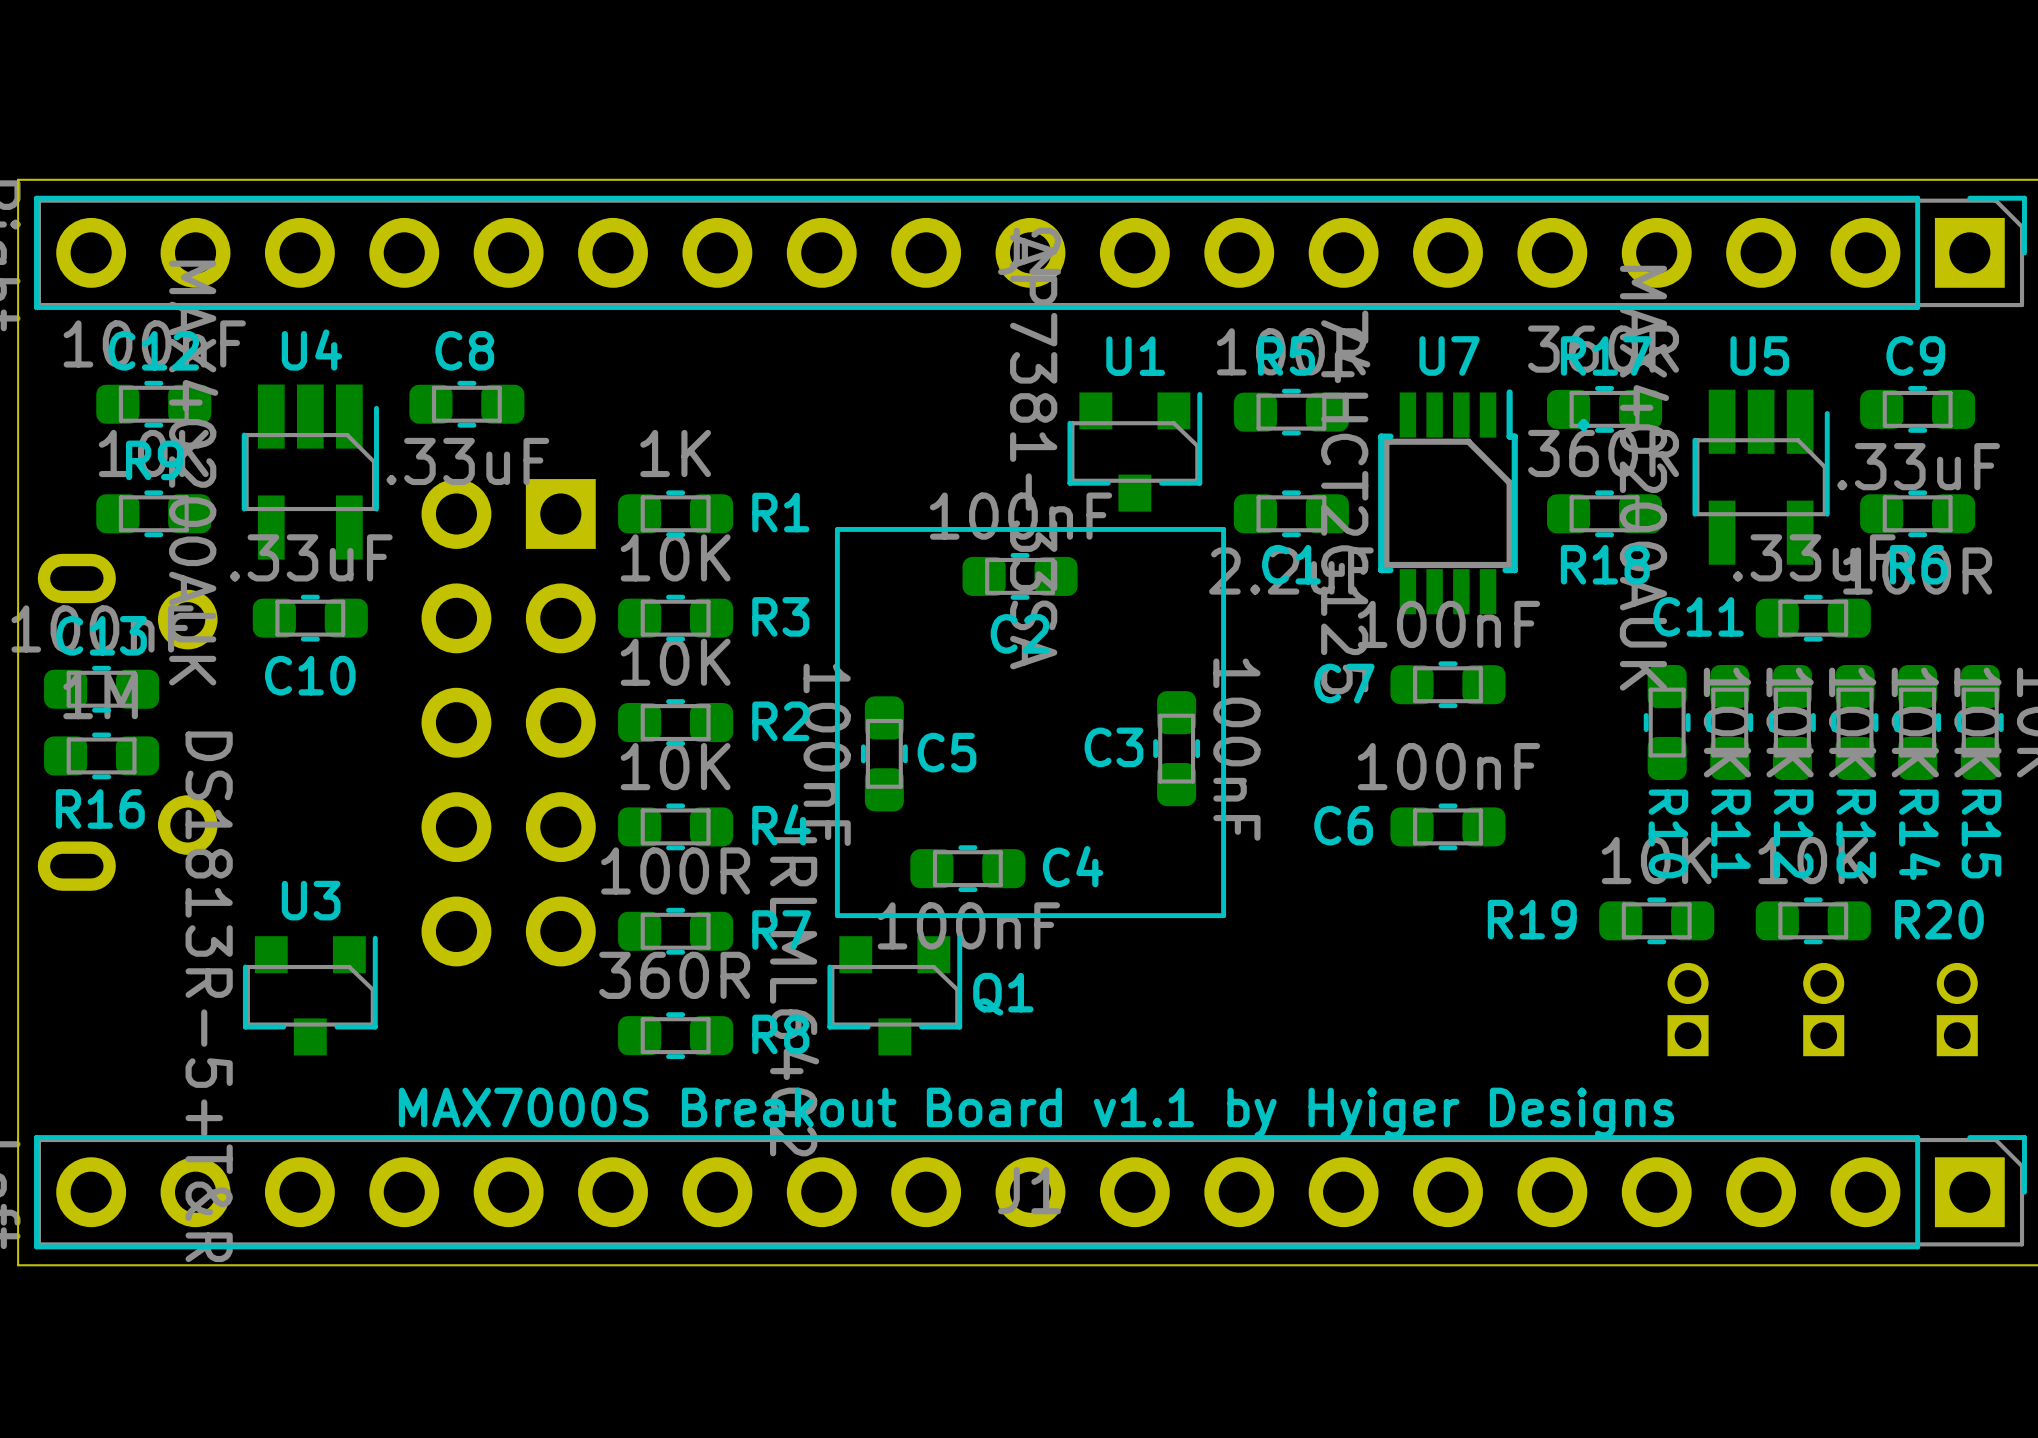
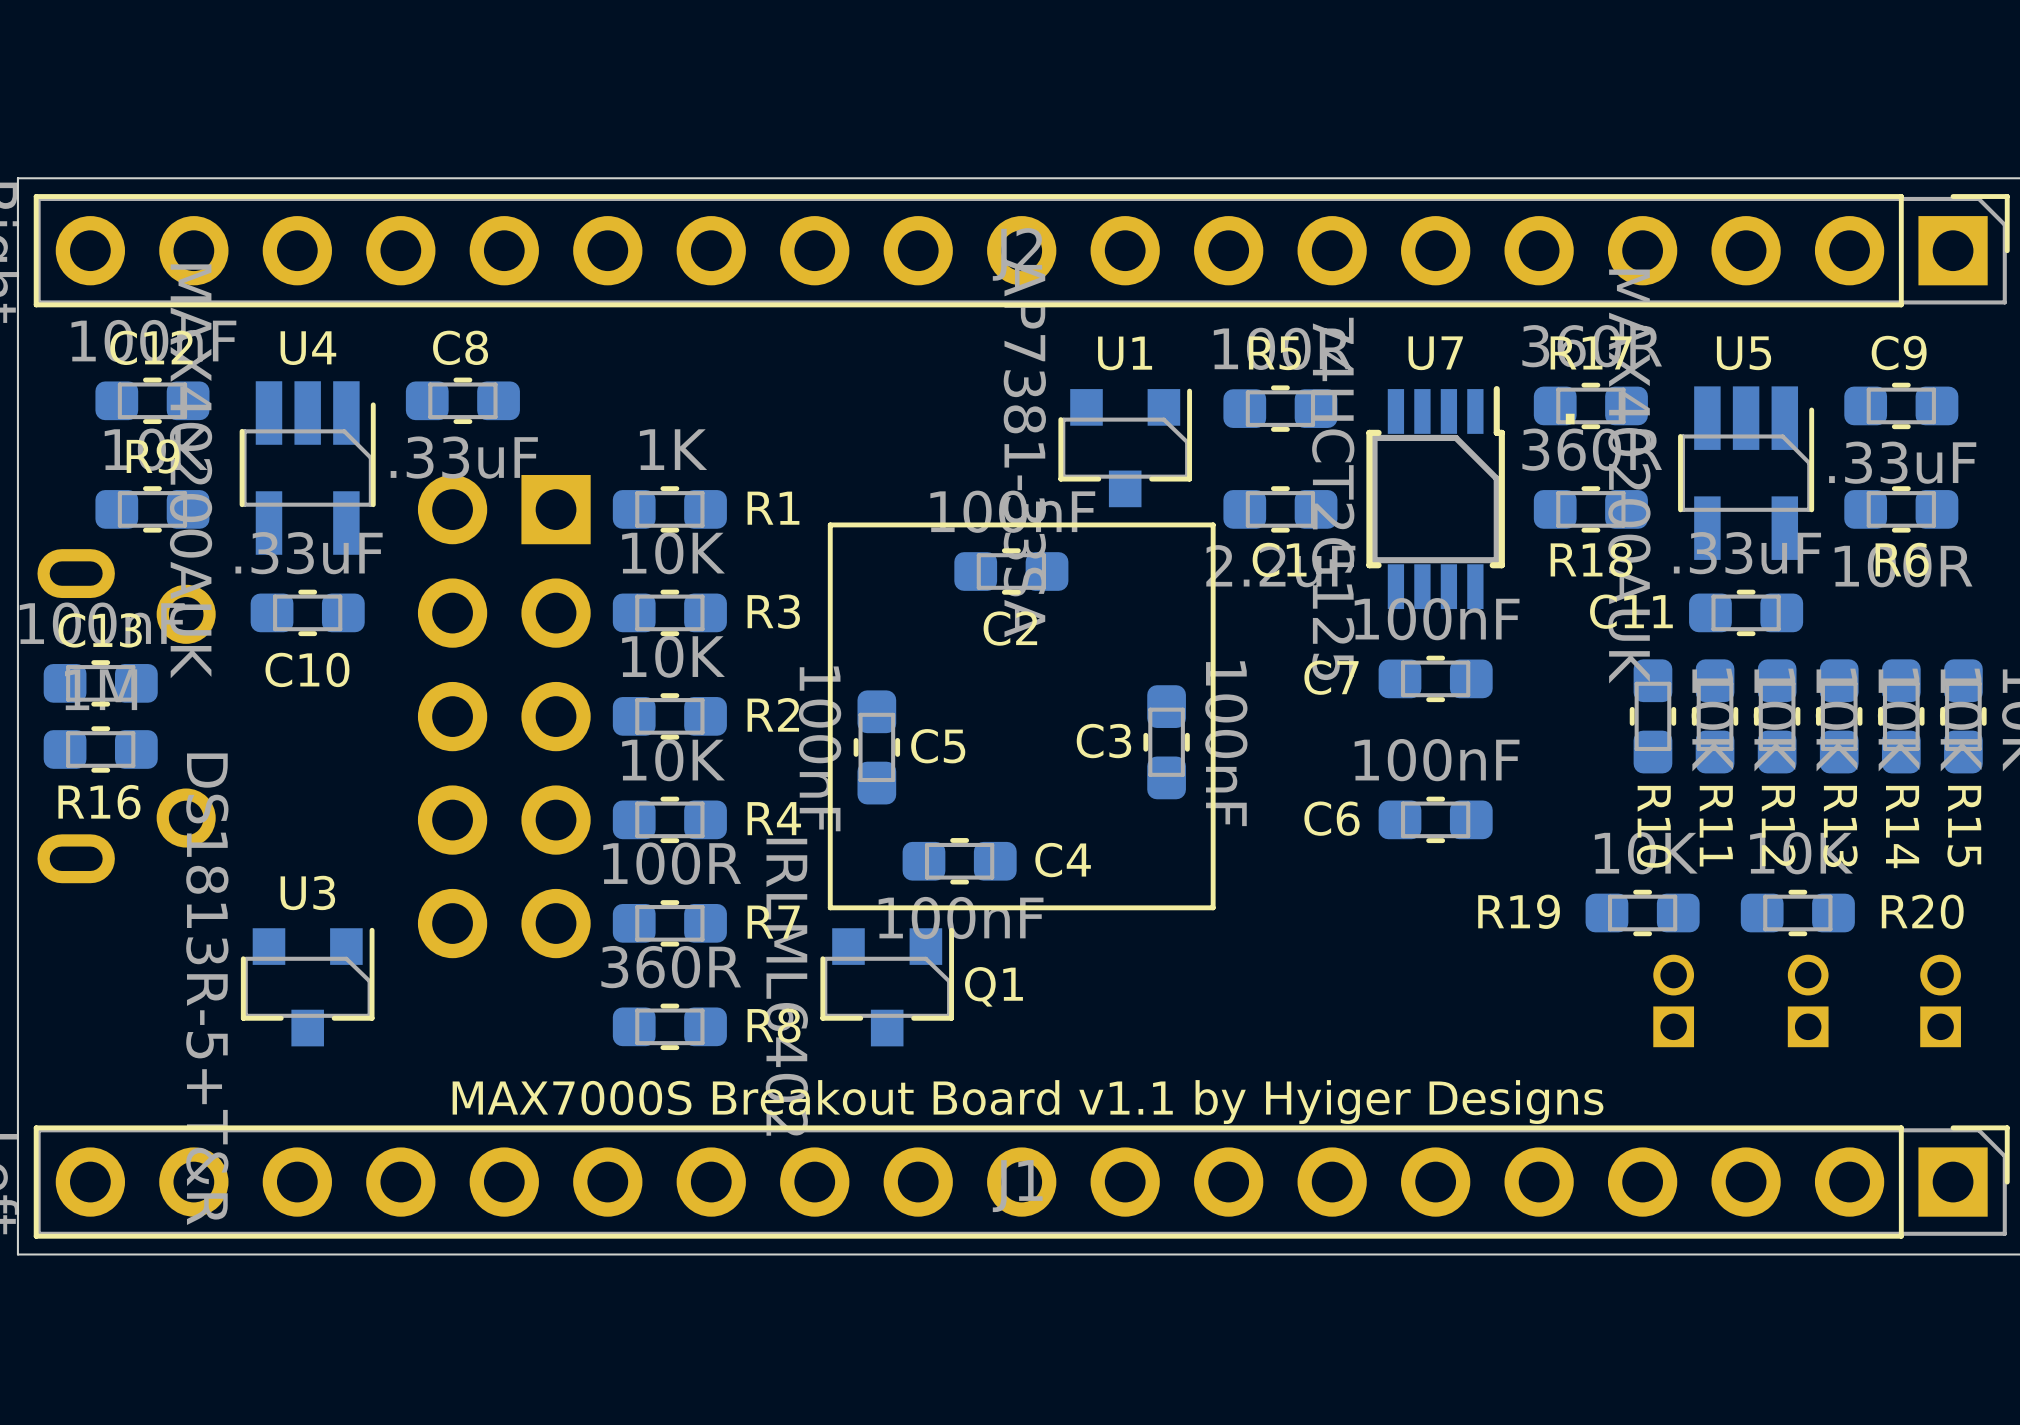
C11 position: (1813, 618) -> (1746, 612)

